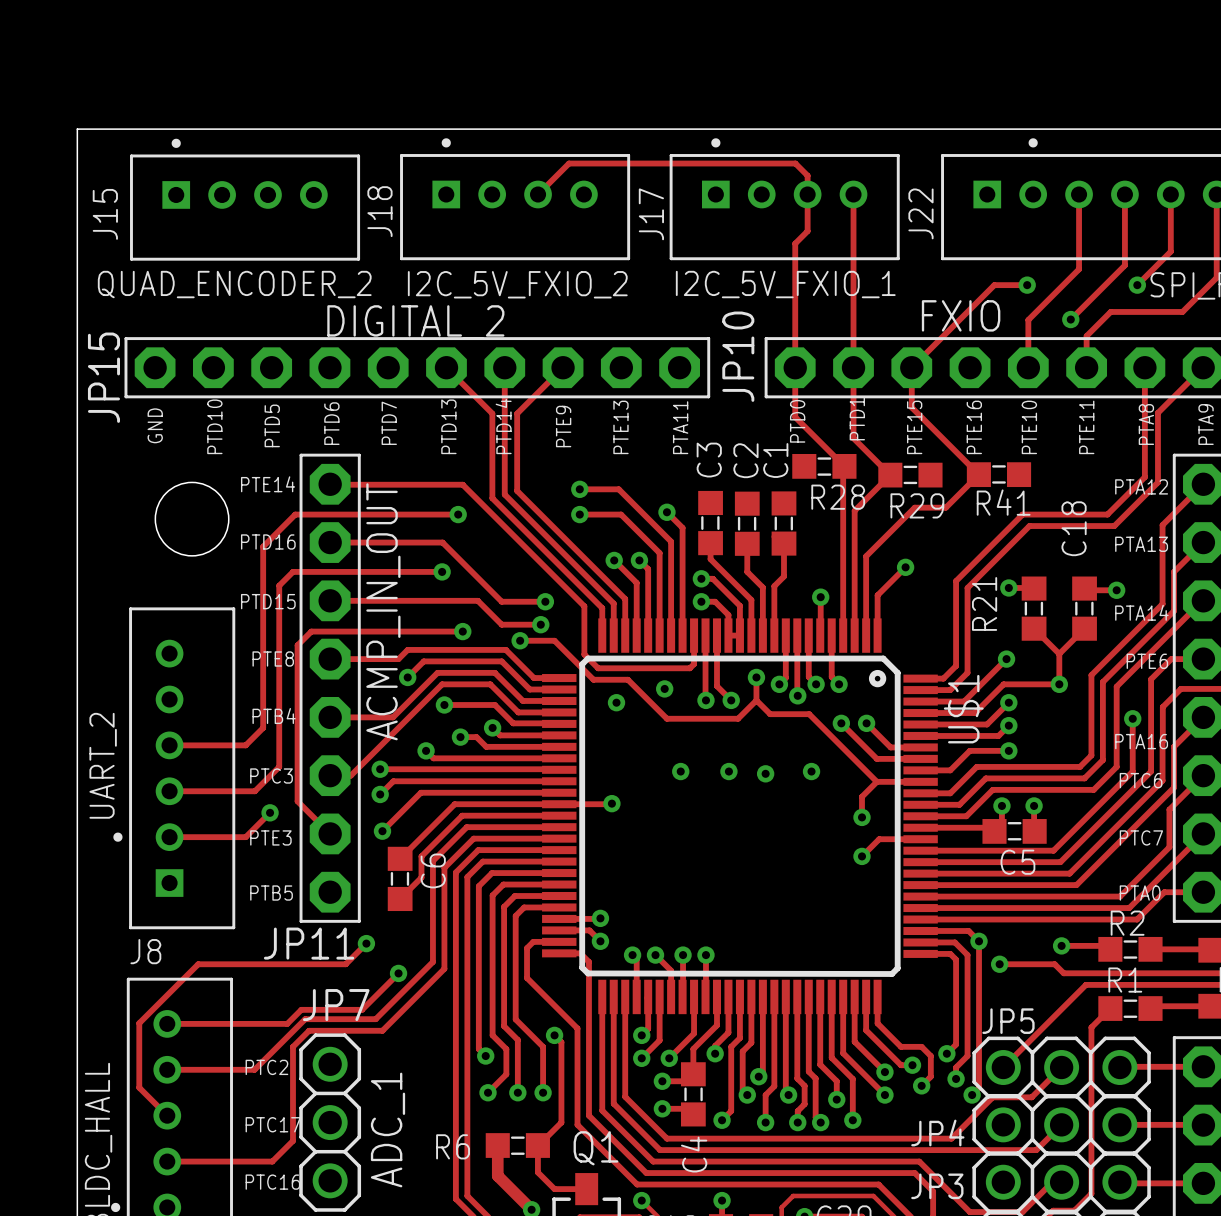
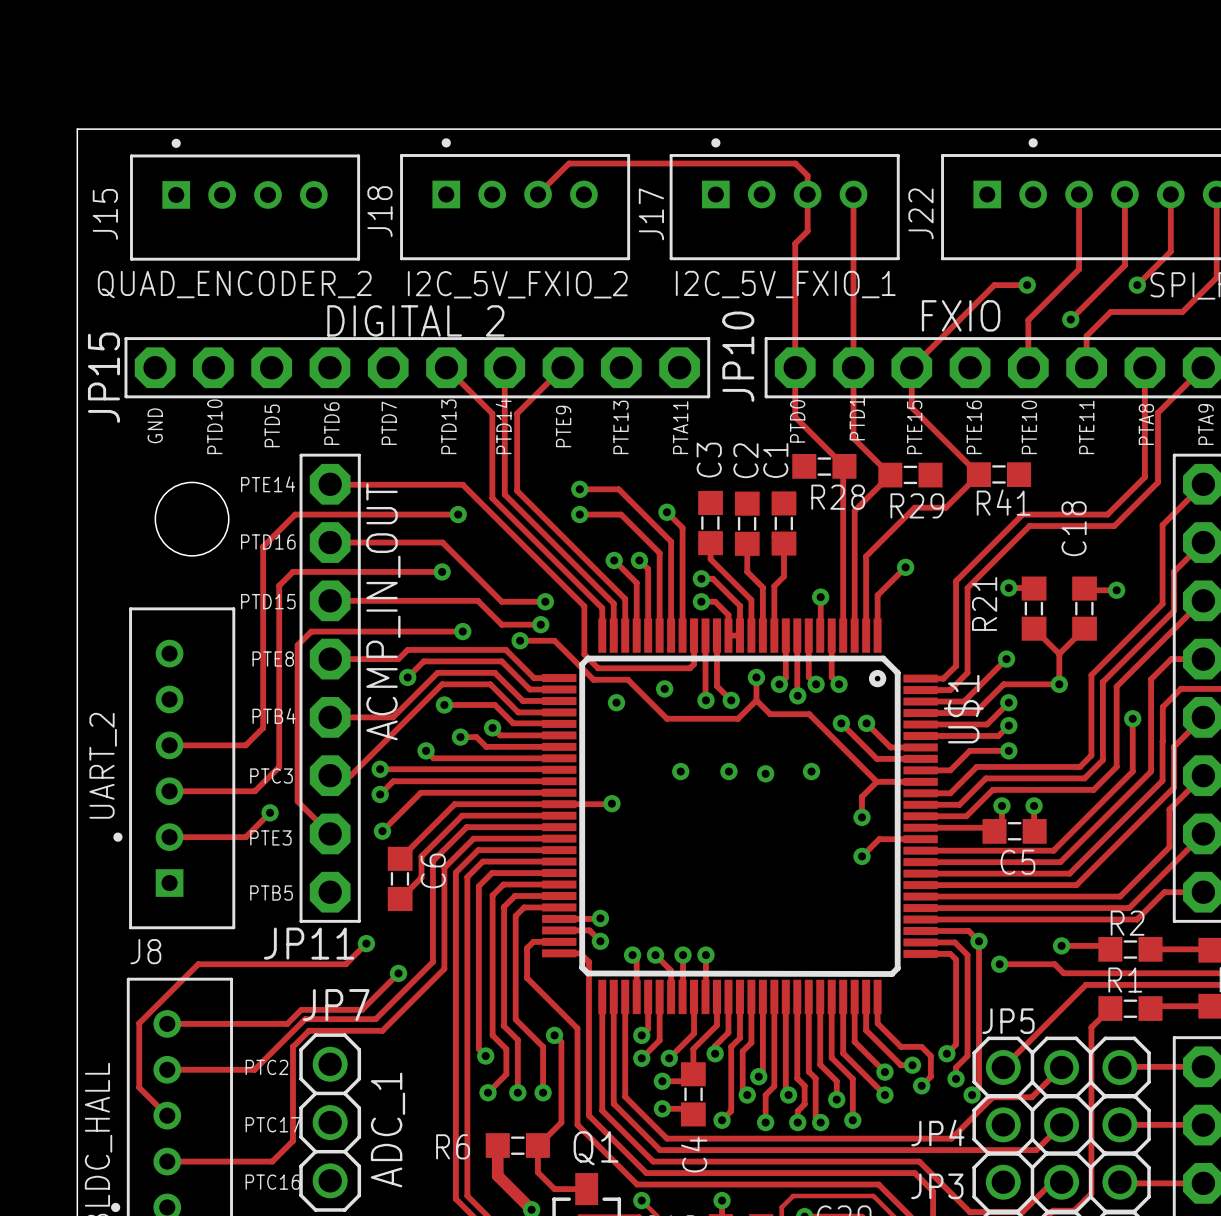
text: PTA12 (1141, 486) -> none
text: PTA13 (1141, 544) -> none
text: PTA14 (1141, 612) -> none
text: PTE6 (1147, 661) -> none
text: PTA16 (1141, 741) -> none
text: PTC6 (1141, 780) -> none
text: PTC7 (1141, 837) -> none
text: PTA0 (1140, 893) -> none

